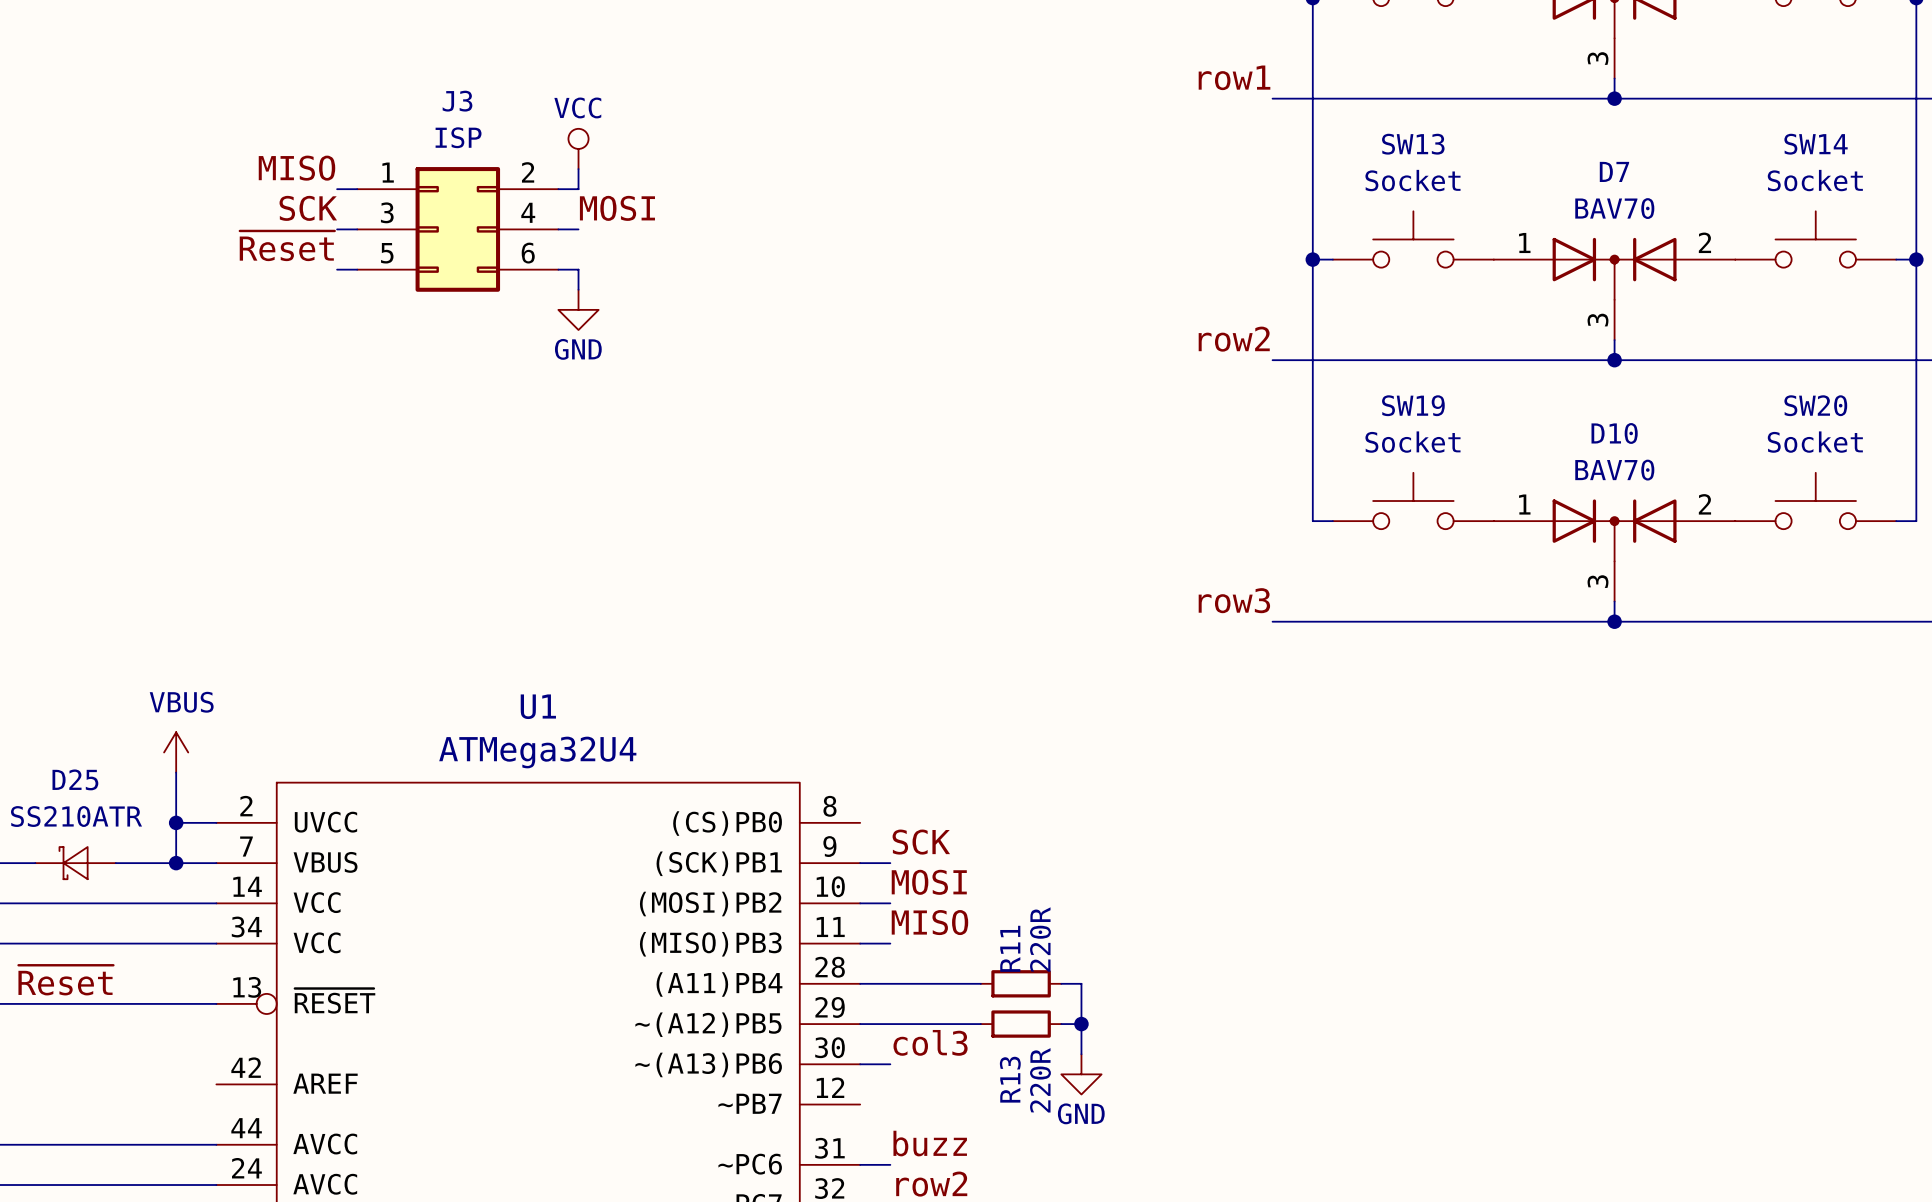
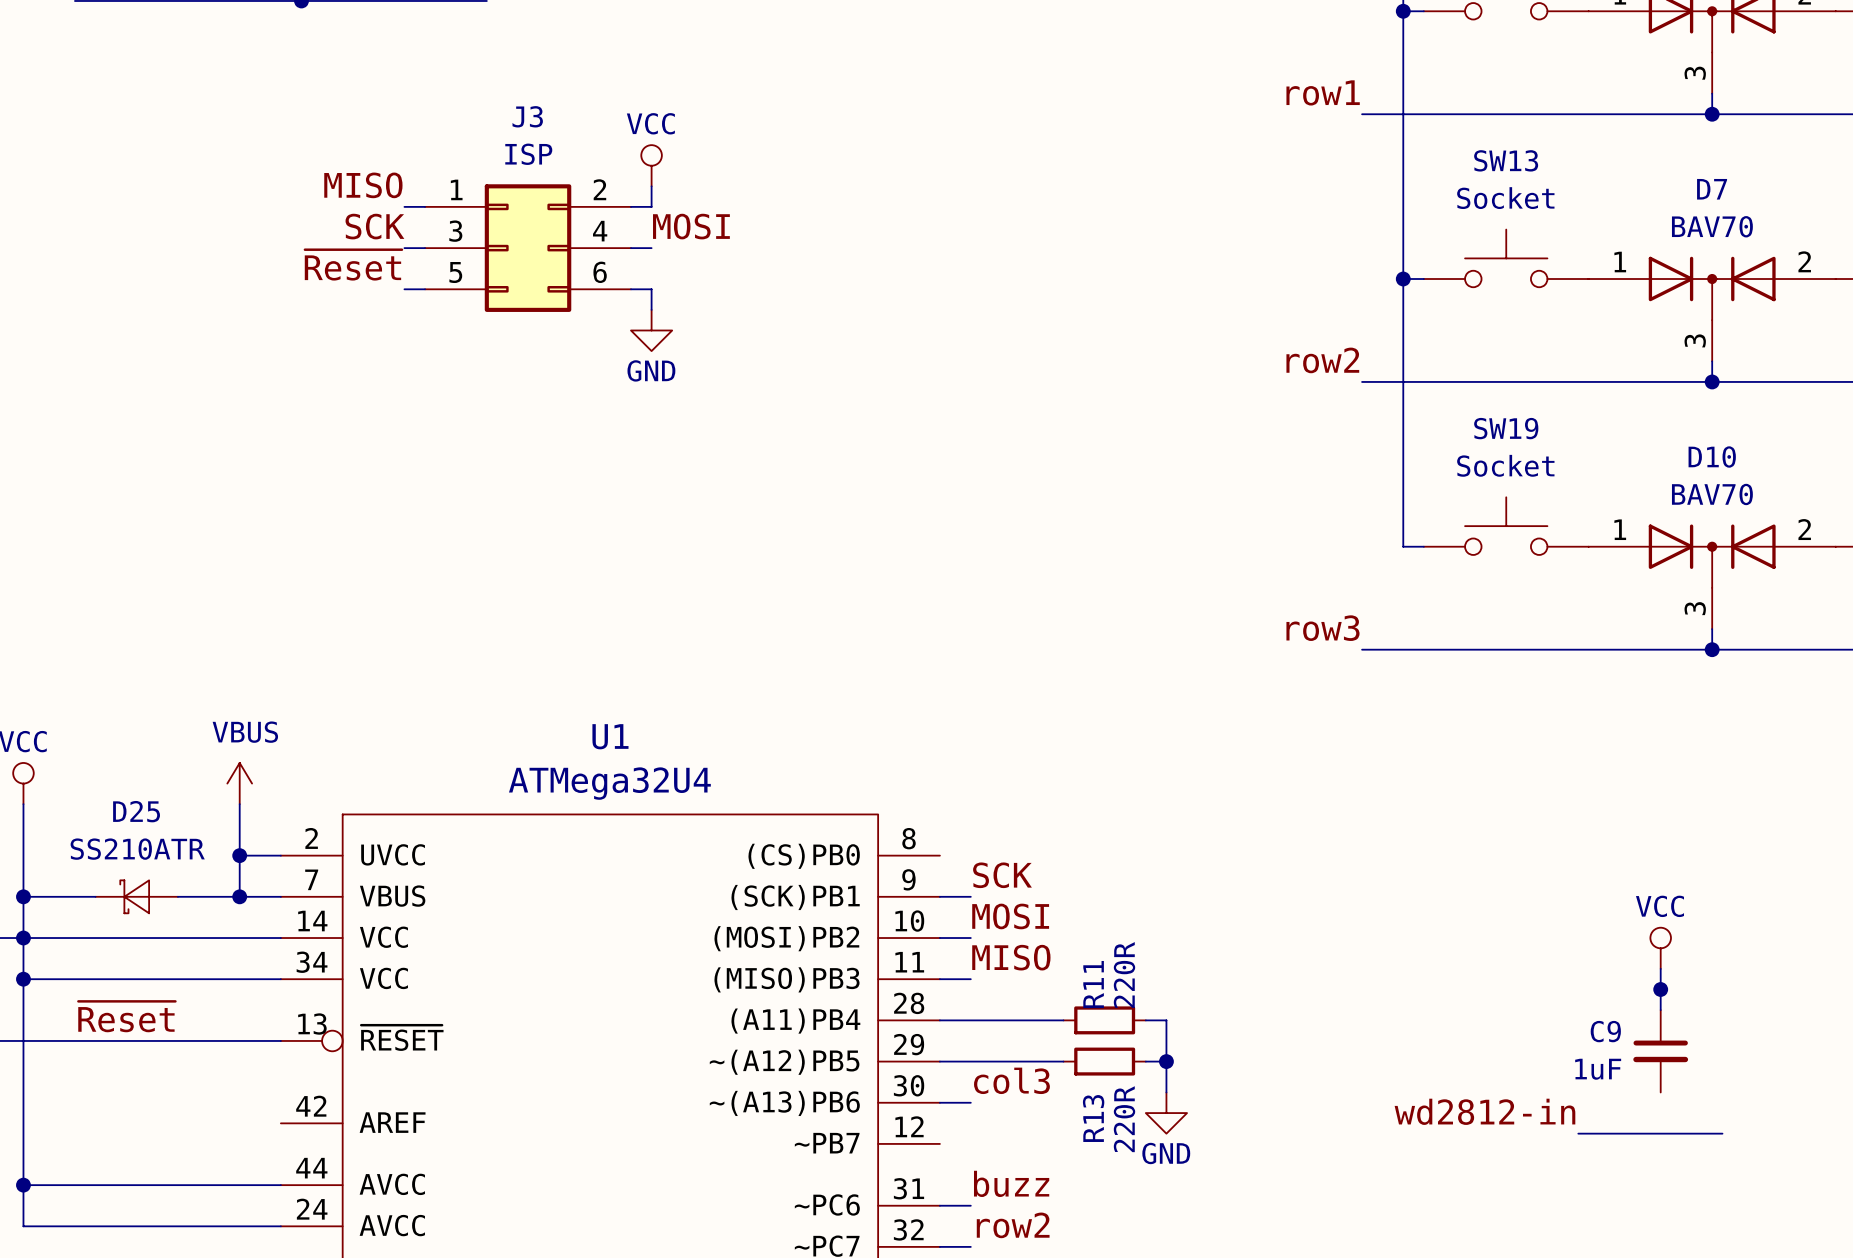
power symbol: none -> VCC (1660, 948)
wire: none -> (1660, 968) (1660, 1010)
junction: none -> (1660, 989)
C9: none -> 1uF (1660, 1051)
label: none -> wd2812-in (1484, 1111)
wire: none -> (1578, 1133) (1722, 1133)

